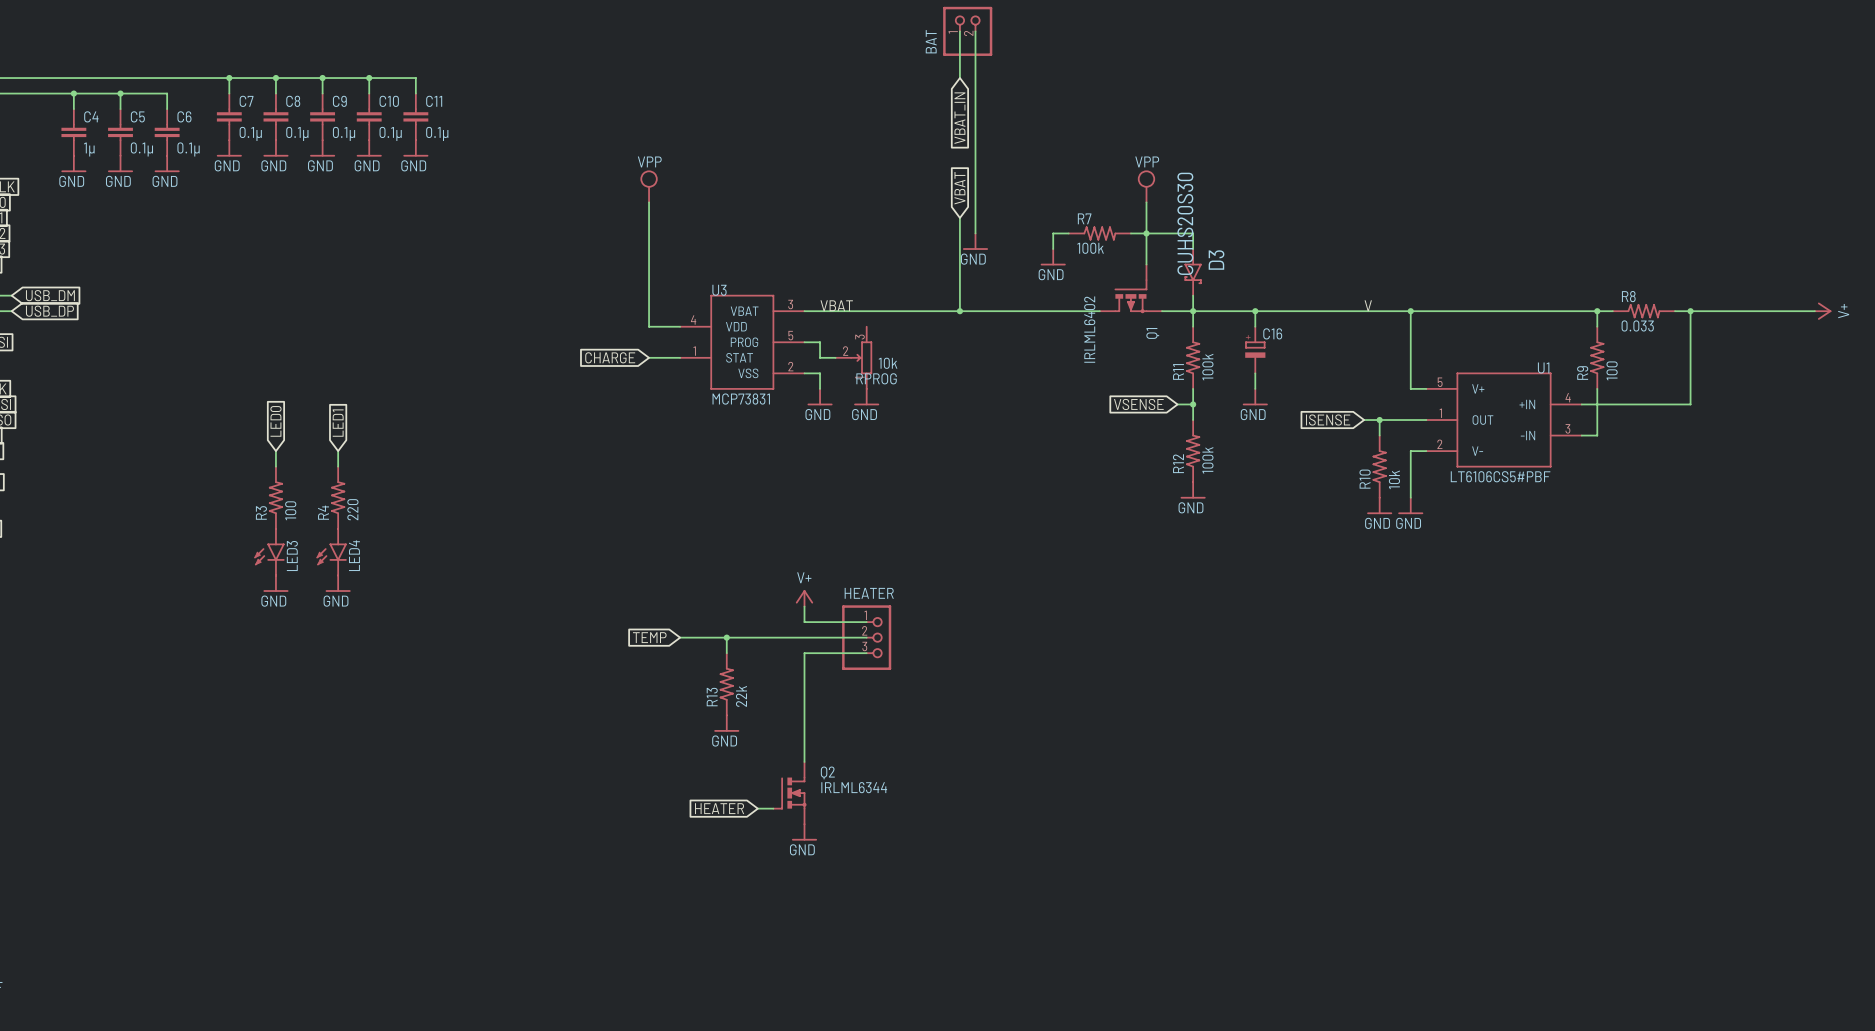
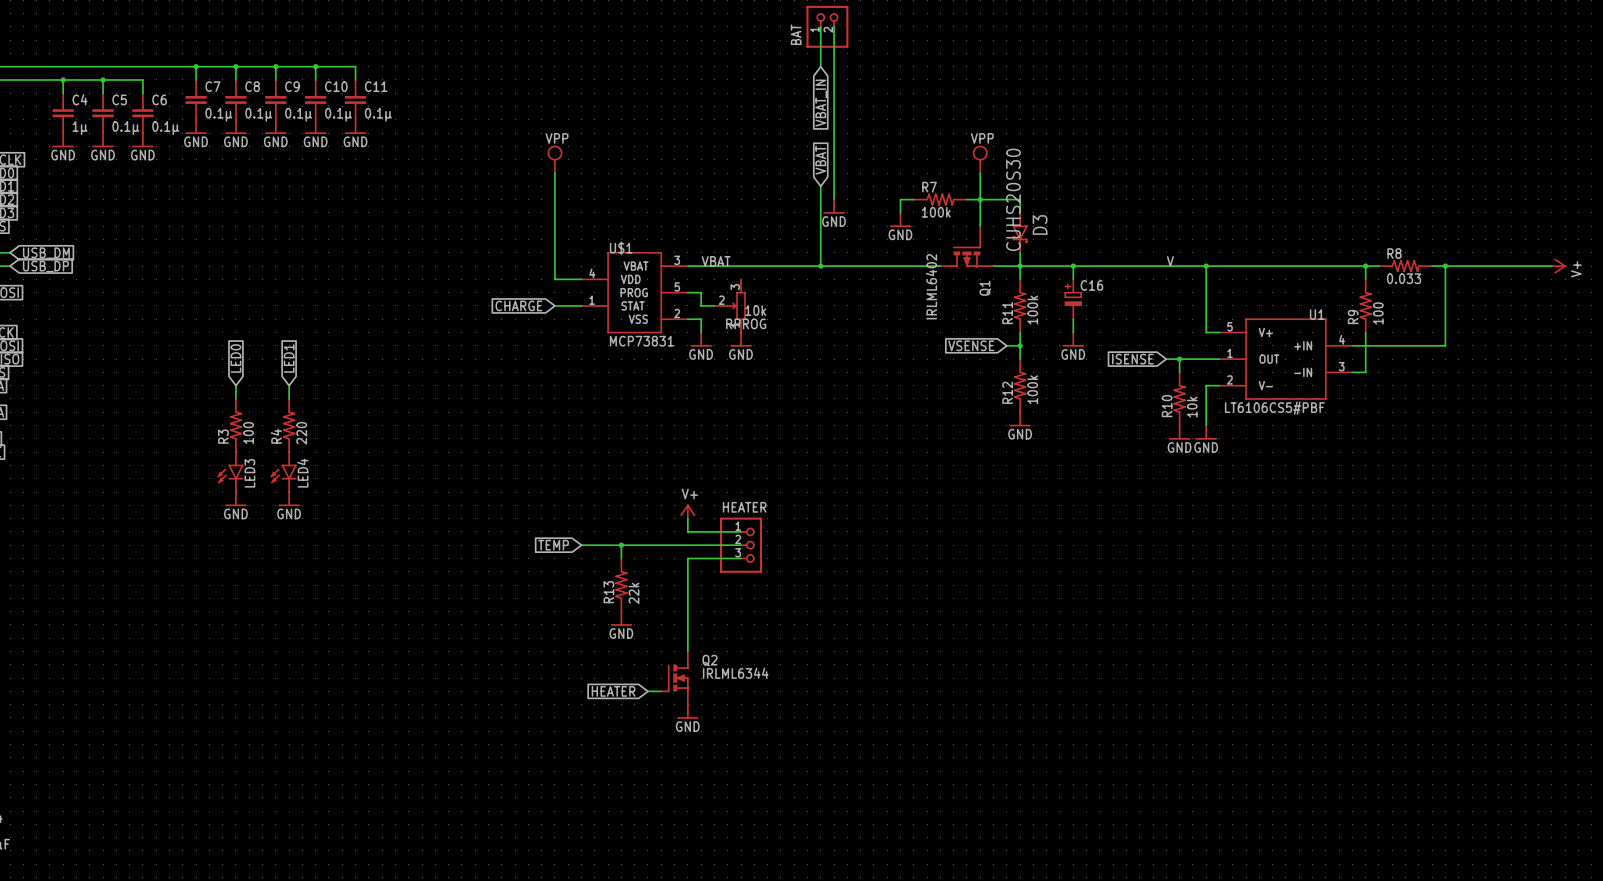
U3 name: U3 (719, 290) -> U$1 (621, 248)

